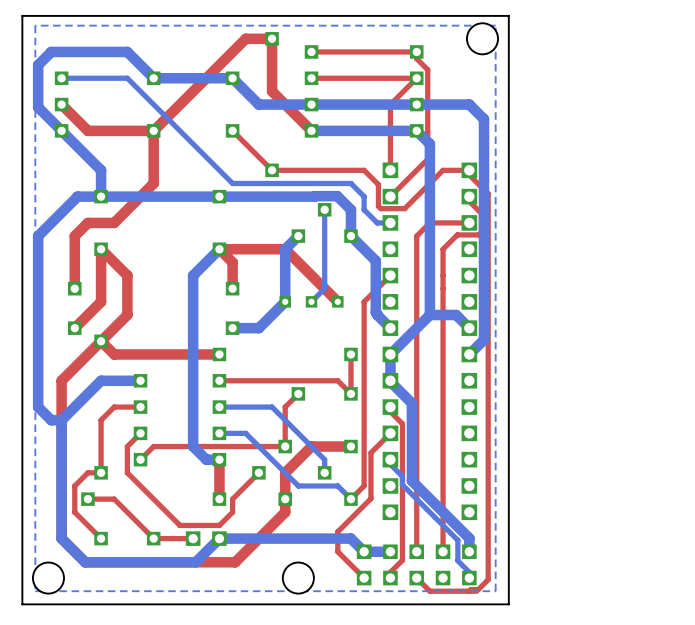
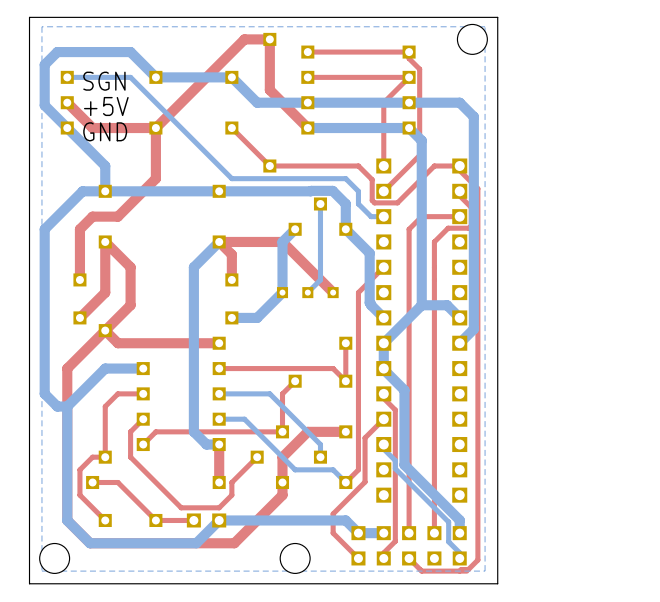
text: none -> SGN (104, 81)
text: none -> +5V (106, 106)
text: none -> GND (105, 131)

